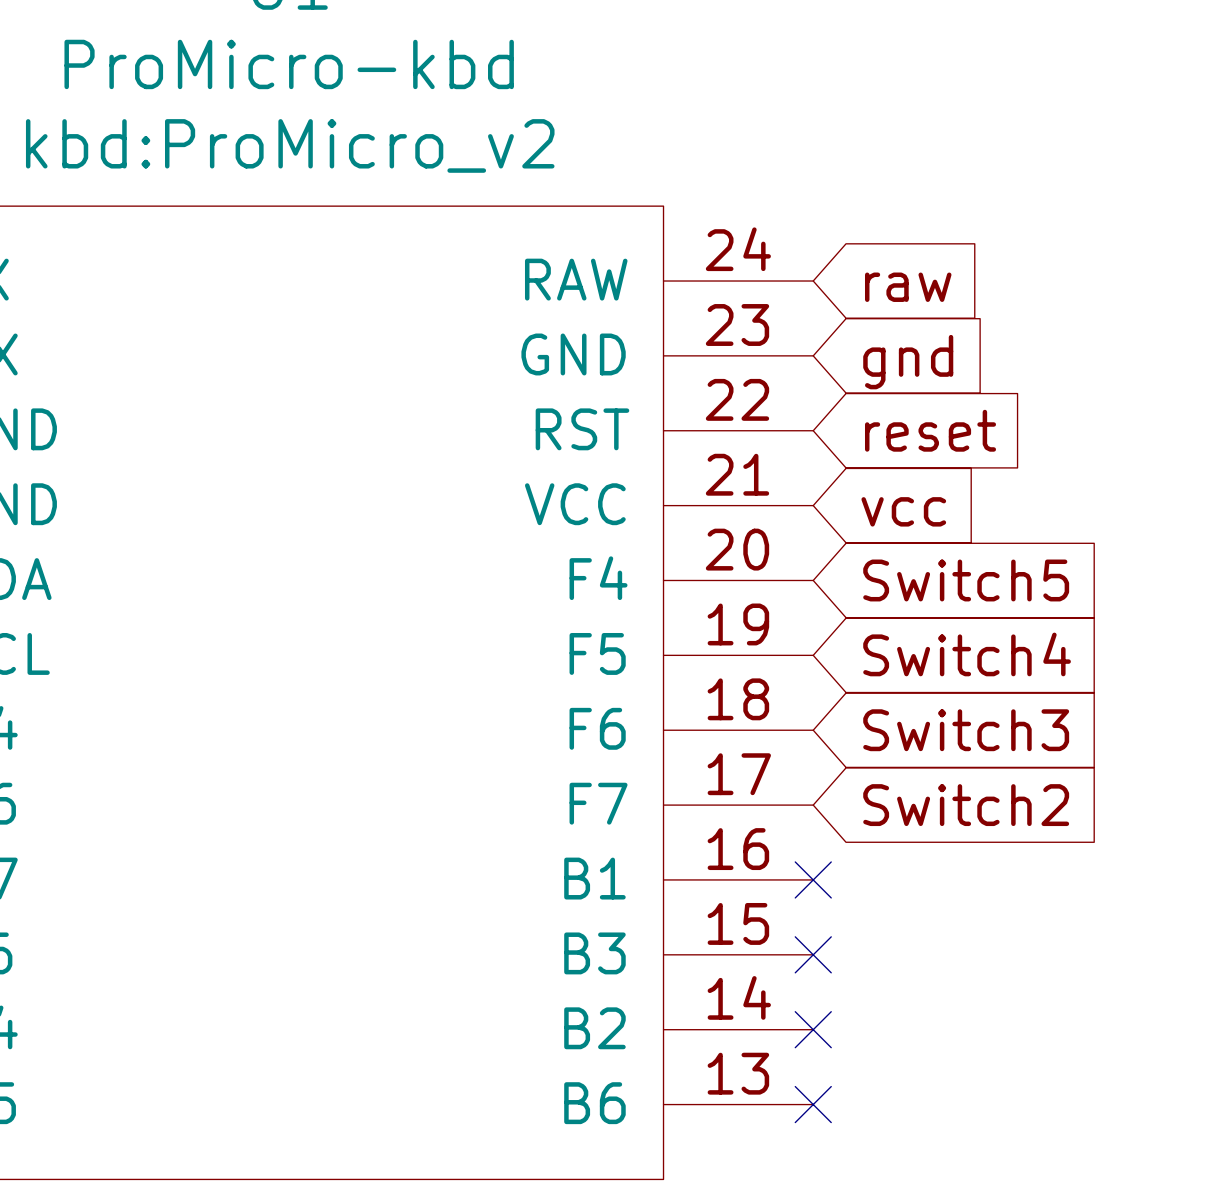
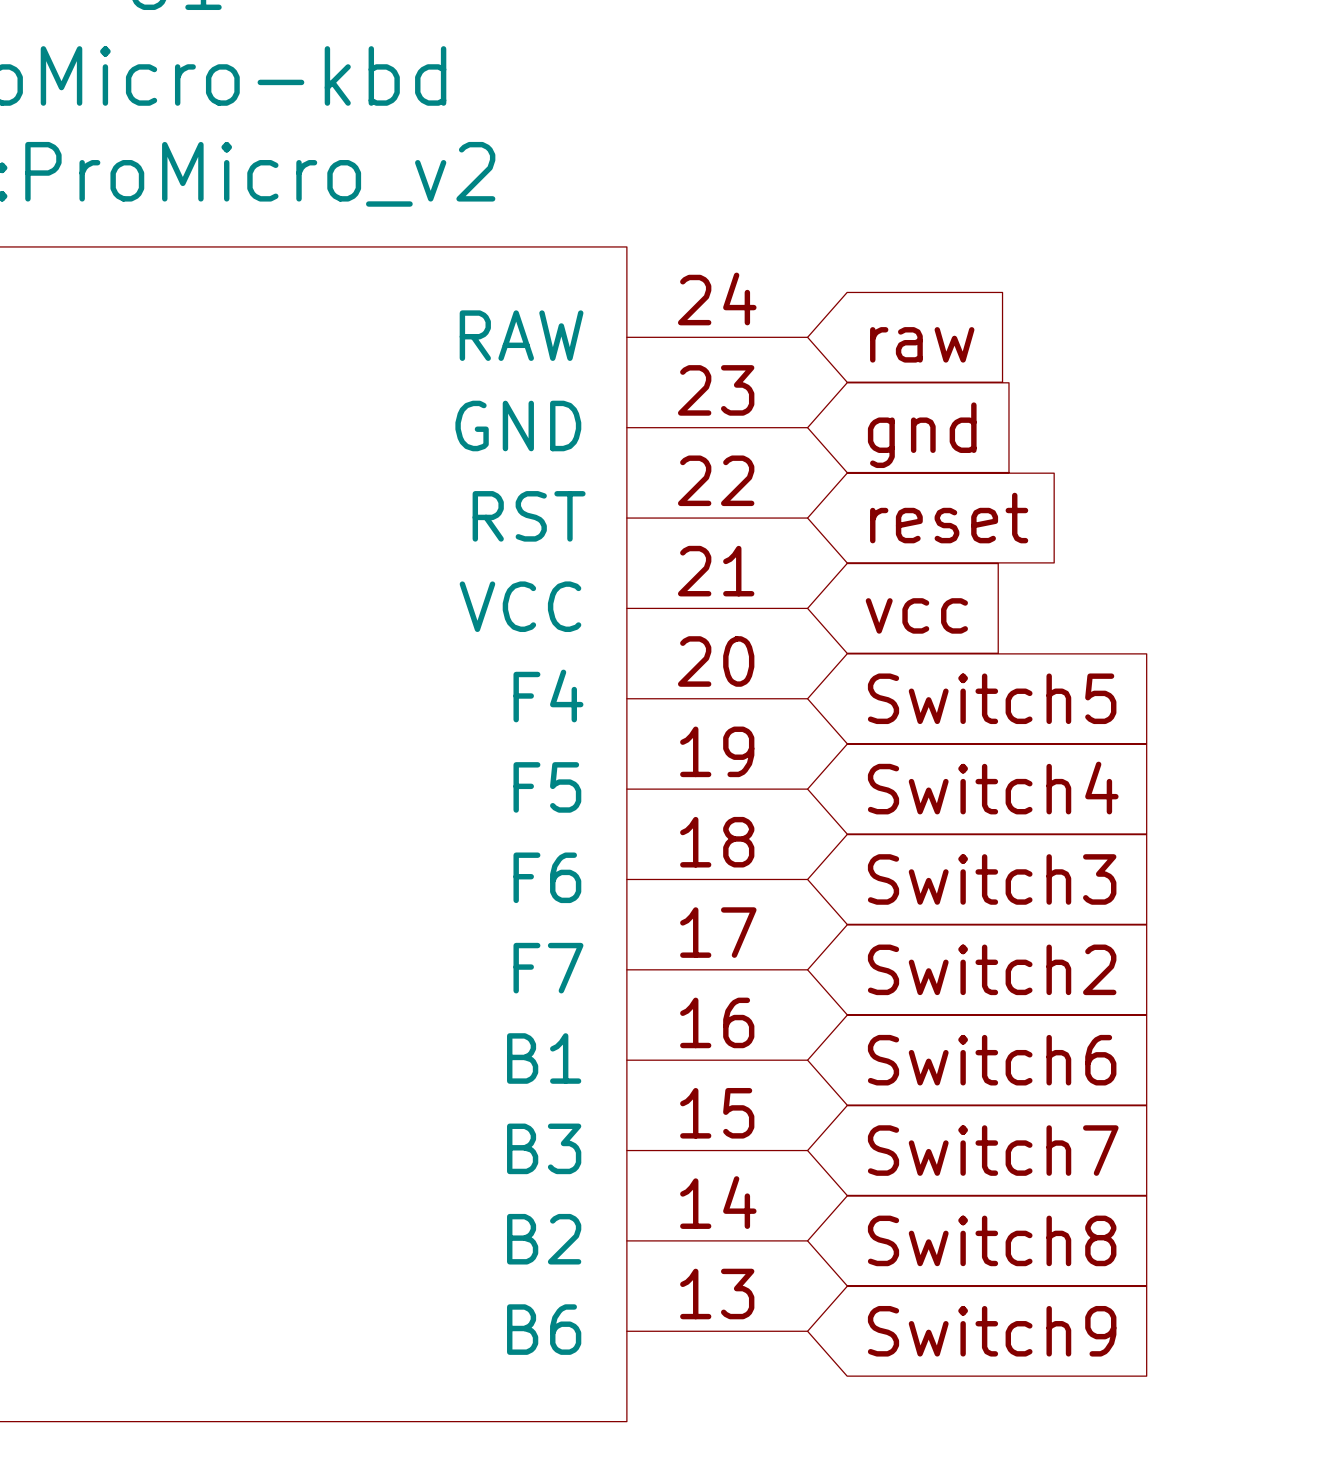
no-connect mark: (813, 879) -> none
global label: none -> Switch6 (992, 1060)
no-connect mark: (813, 954) -> none
global label: none -> Switch7 (993, 1150)
no-connect mark: (813, 1029) -> none
global label: none -> Switch8 (992, 1240)
no-connect mark: (813, 1104) -> none
global label: none -> Switch9 (992, 1331)

